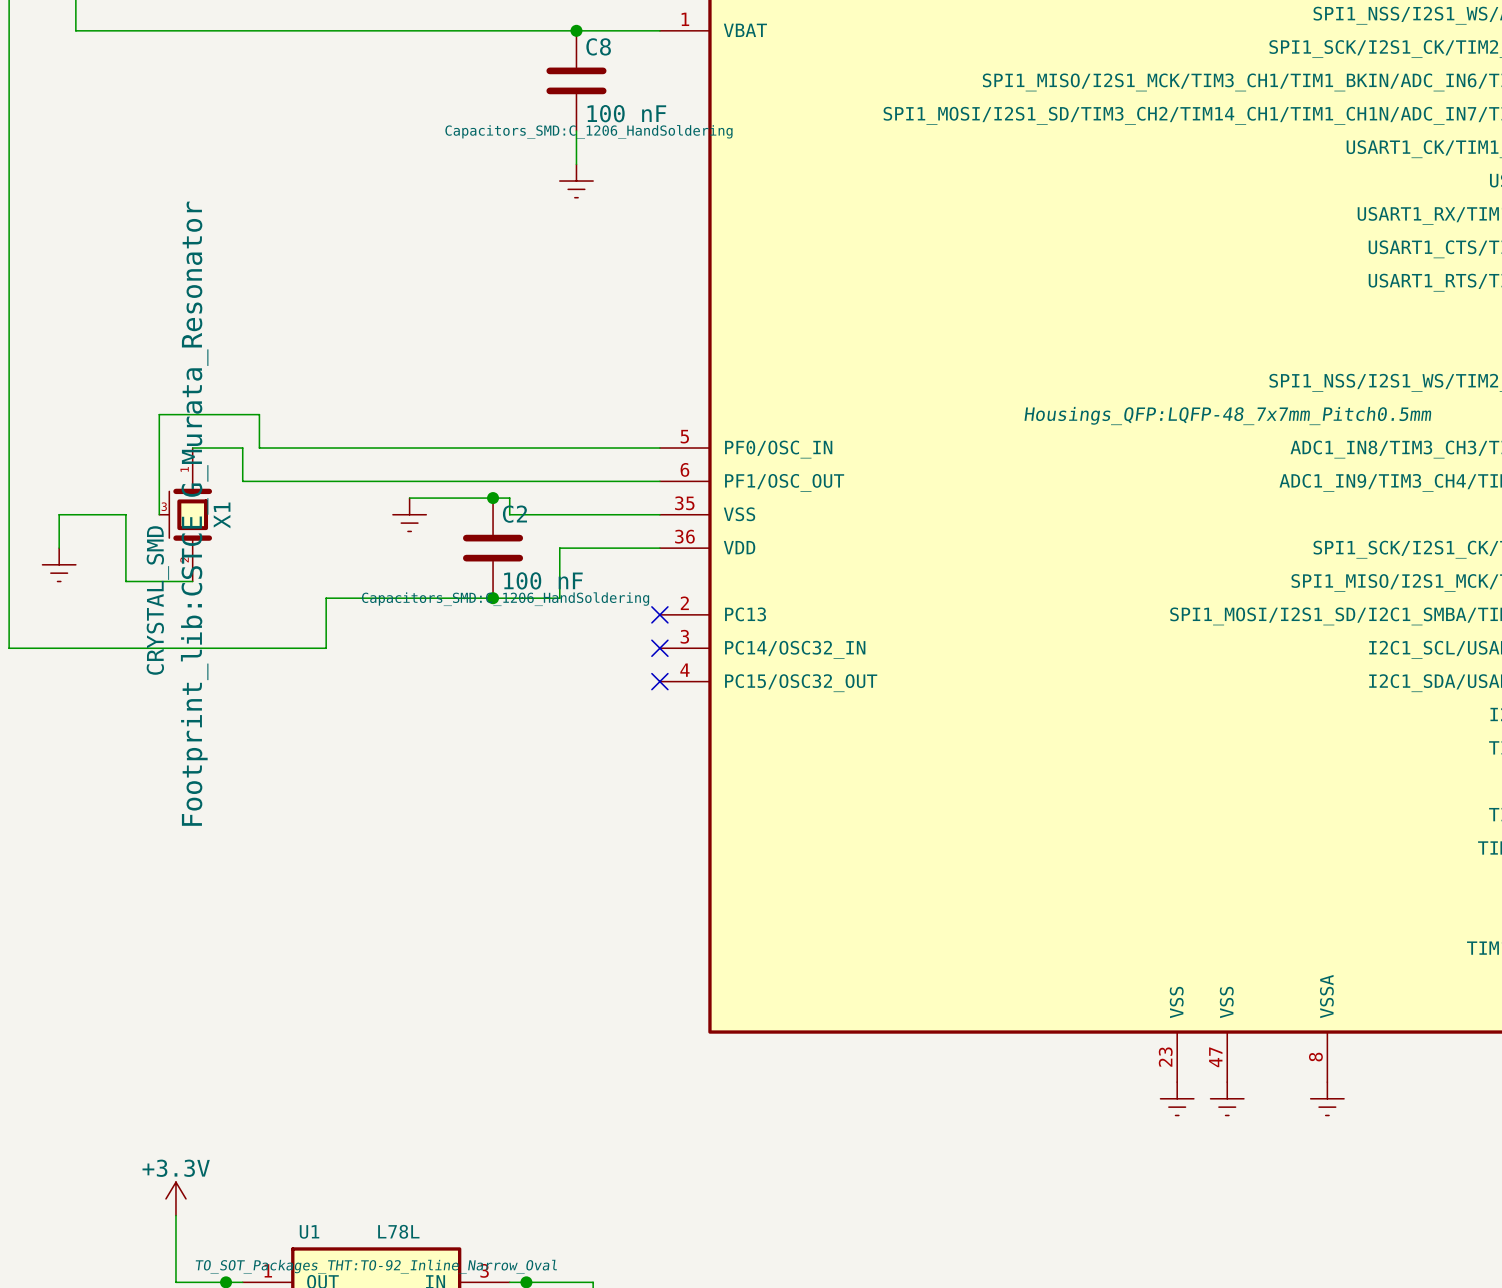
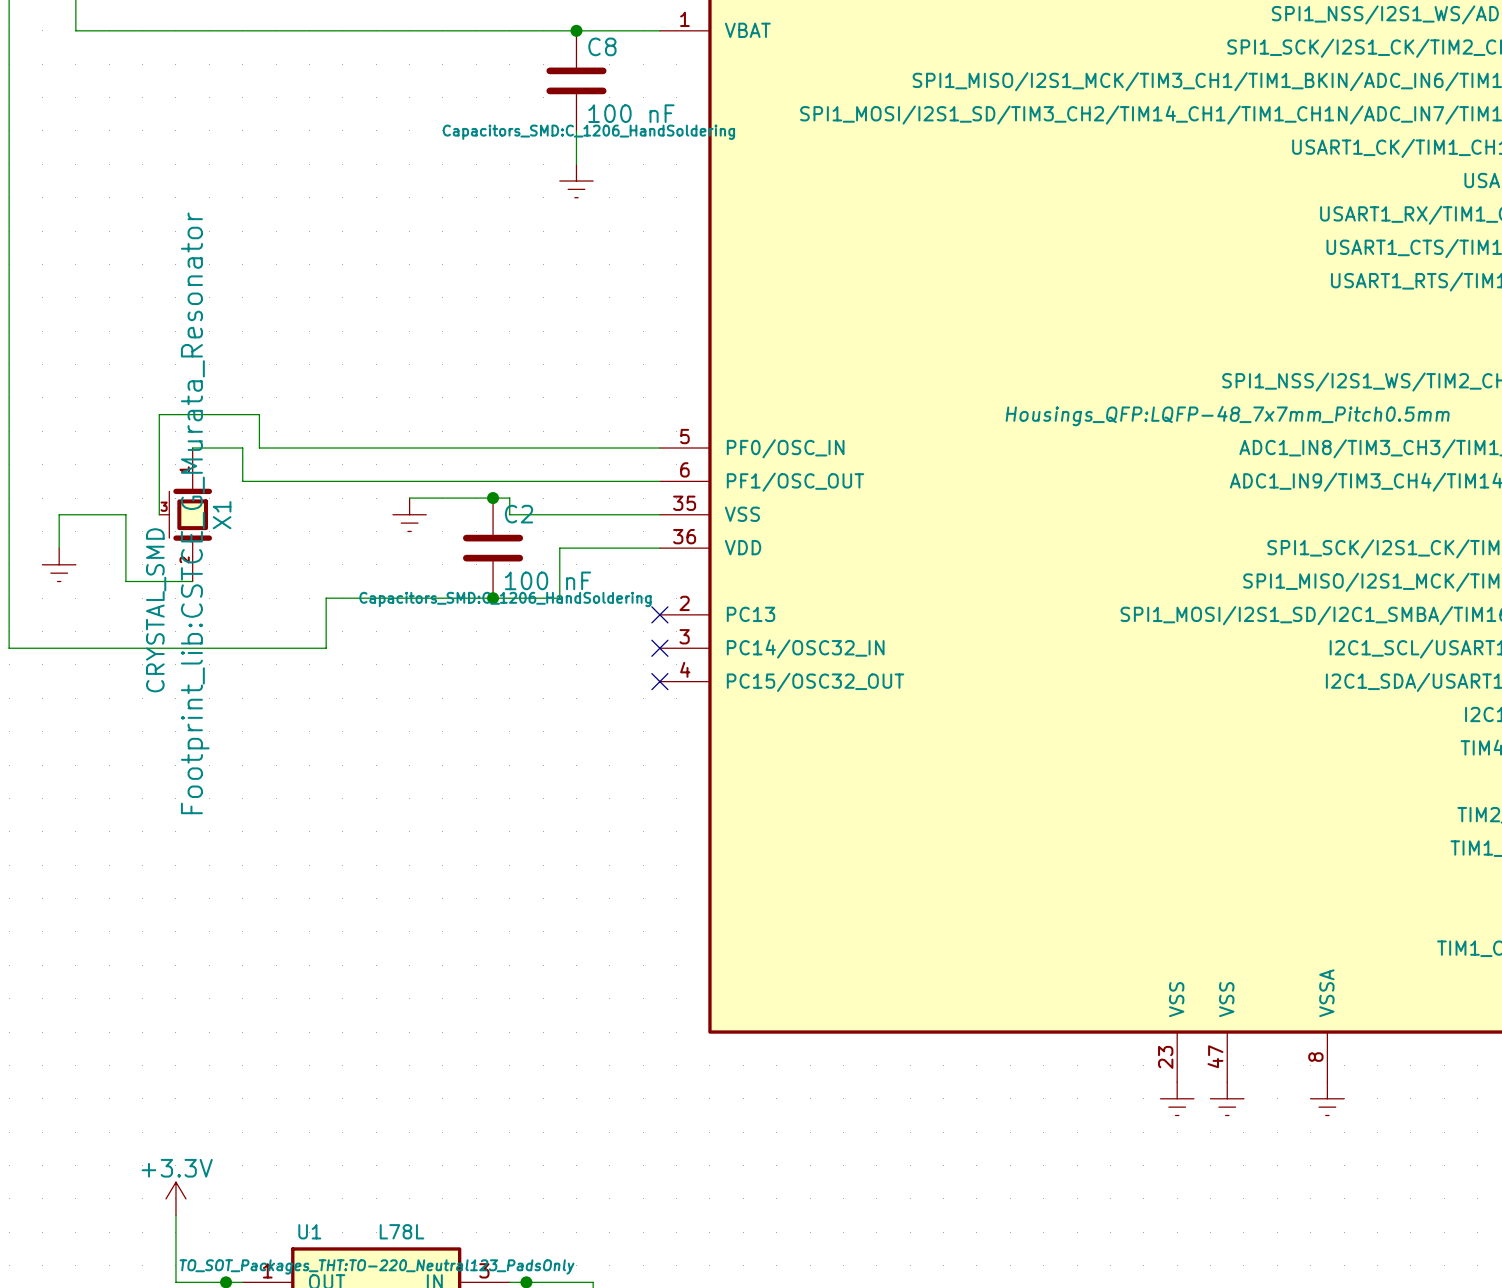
U1 text: TO_SOT_Packages_THT:TO-92_Inline_Narrow_Oval (376, 1266) -> TO_SOT_Packages_THT:TO-220_Neutral123_PadsOnly (377, 1266)

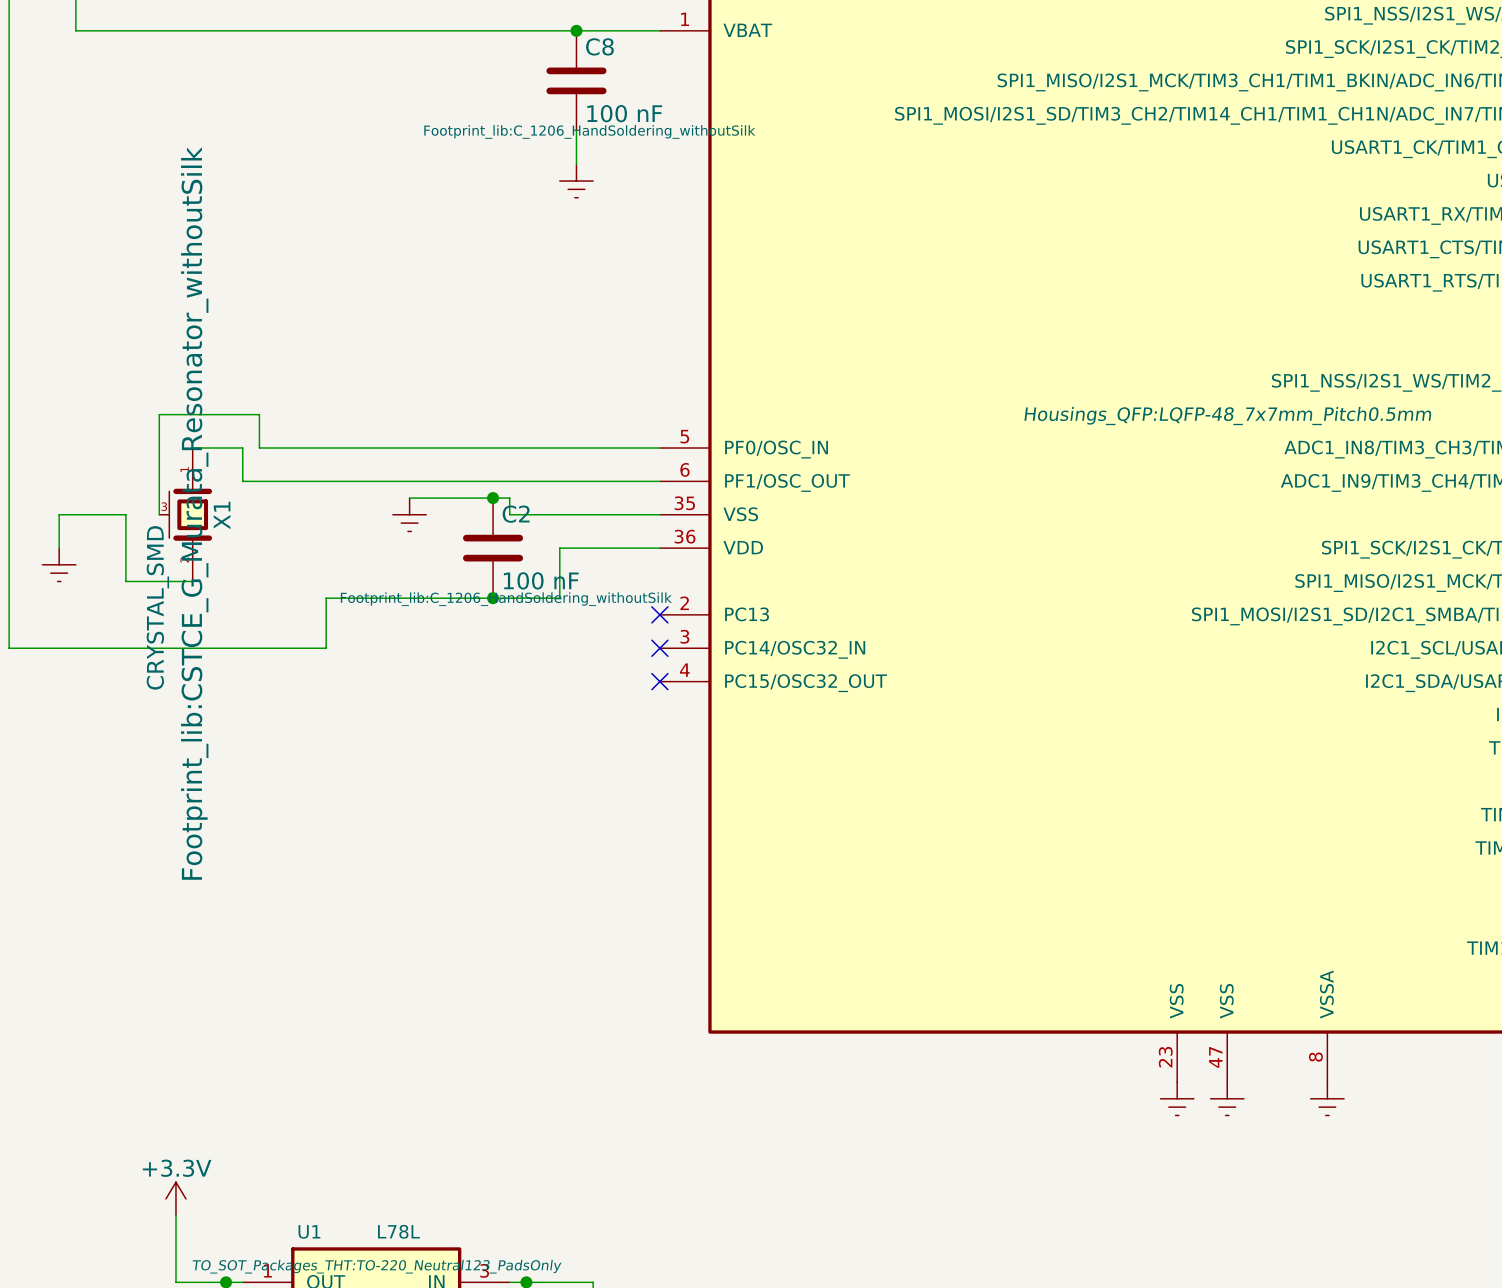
C8 text: Capacitors_SMD:C_1206_HandSoldering (588, 132) -> Footprint_lib:C_1206_HandSoldering_withoutSilk (589, 131)
X1 text: Footprint_lib:CSTCE_G_Murata_Resonator (195, 513) -> Footprint_lib:CSTCE_G_Murata_Resonator_withoutSilk (194, 513)
C2 text: Capacitors_SMD:C_1206_HandSoldering (505, 599) -> Footprint_lib:C_1206_HandSoldering_withoutSilk (506, 599)

